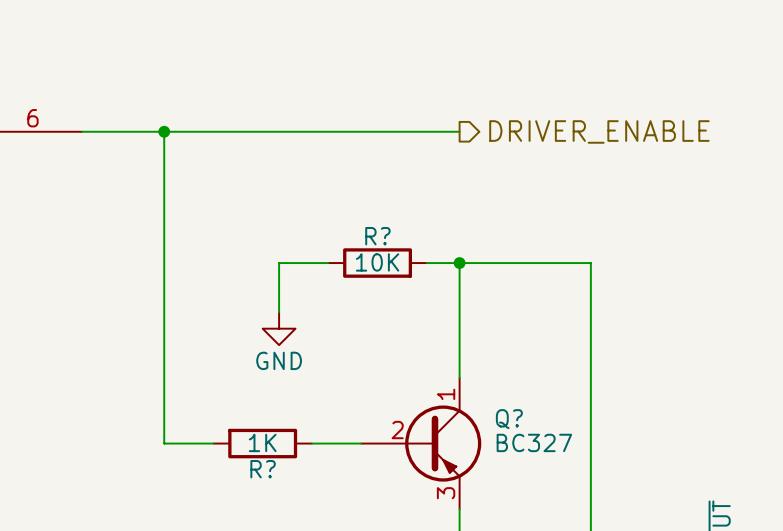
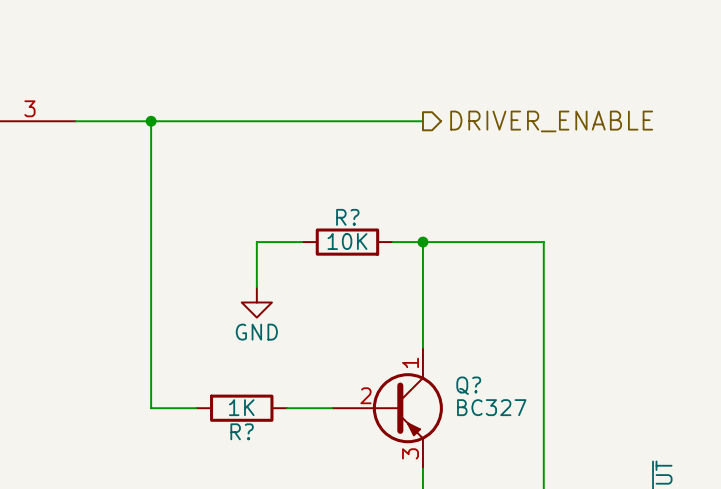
part pin number: 6 (32, 118) -> 3 (29, 108)

